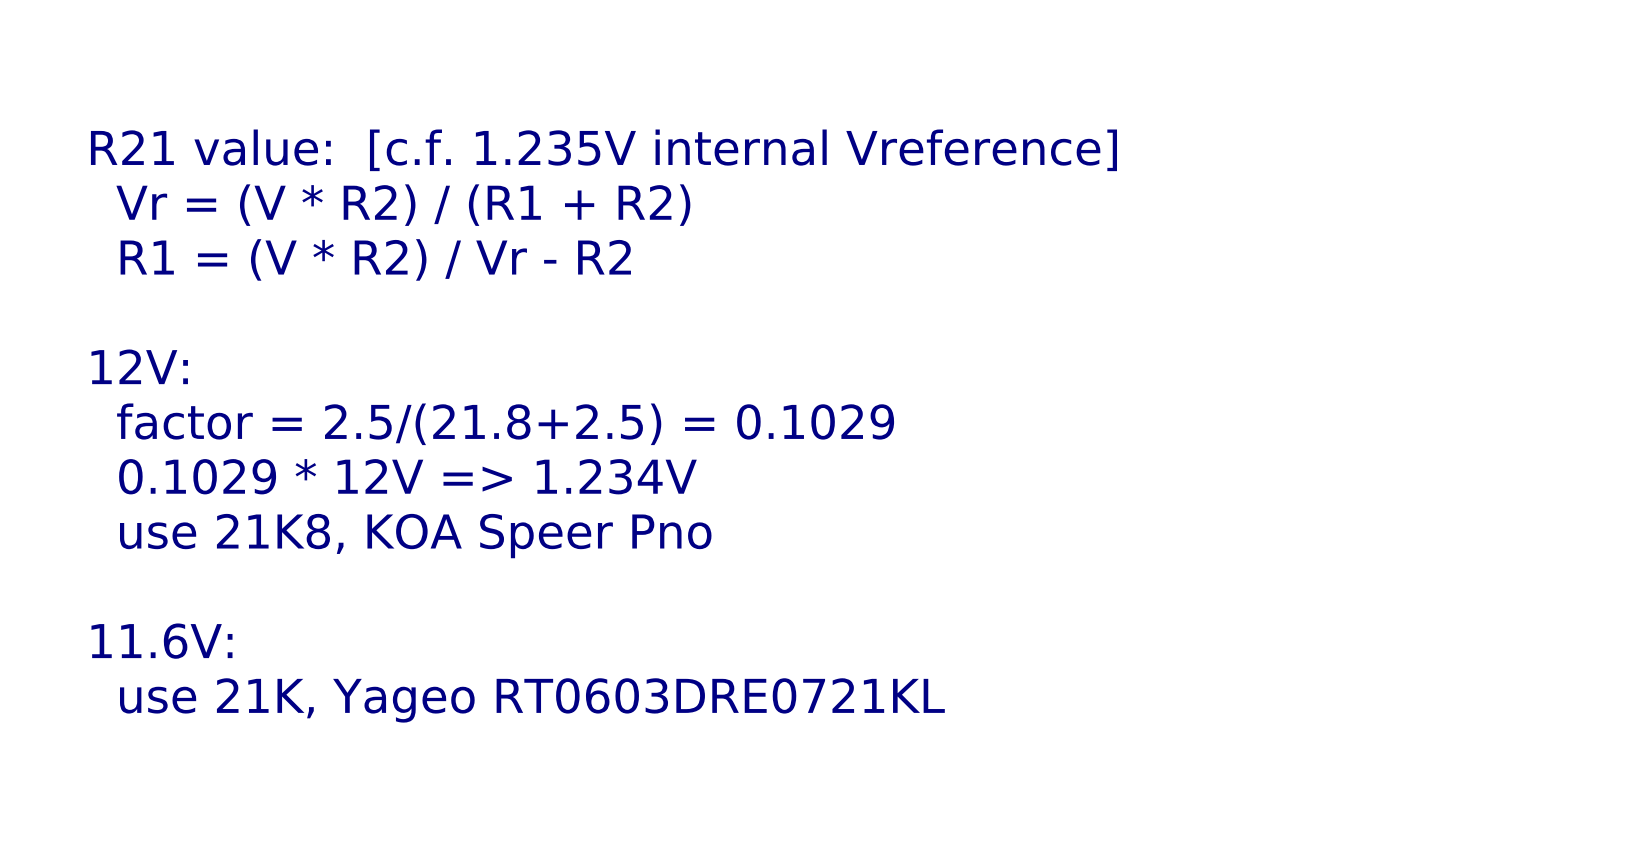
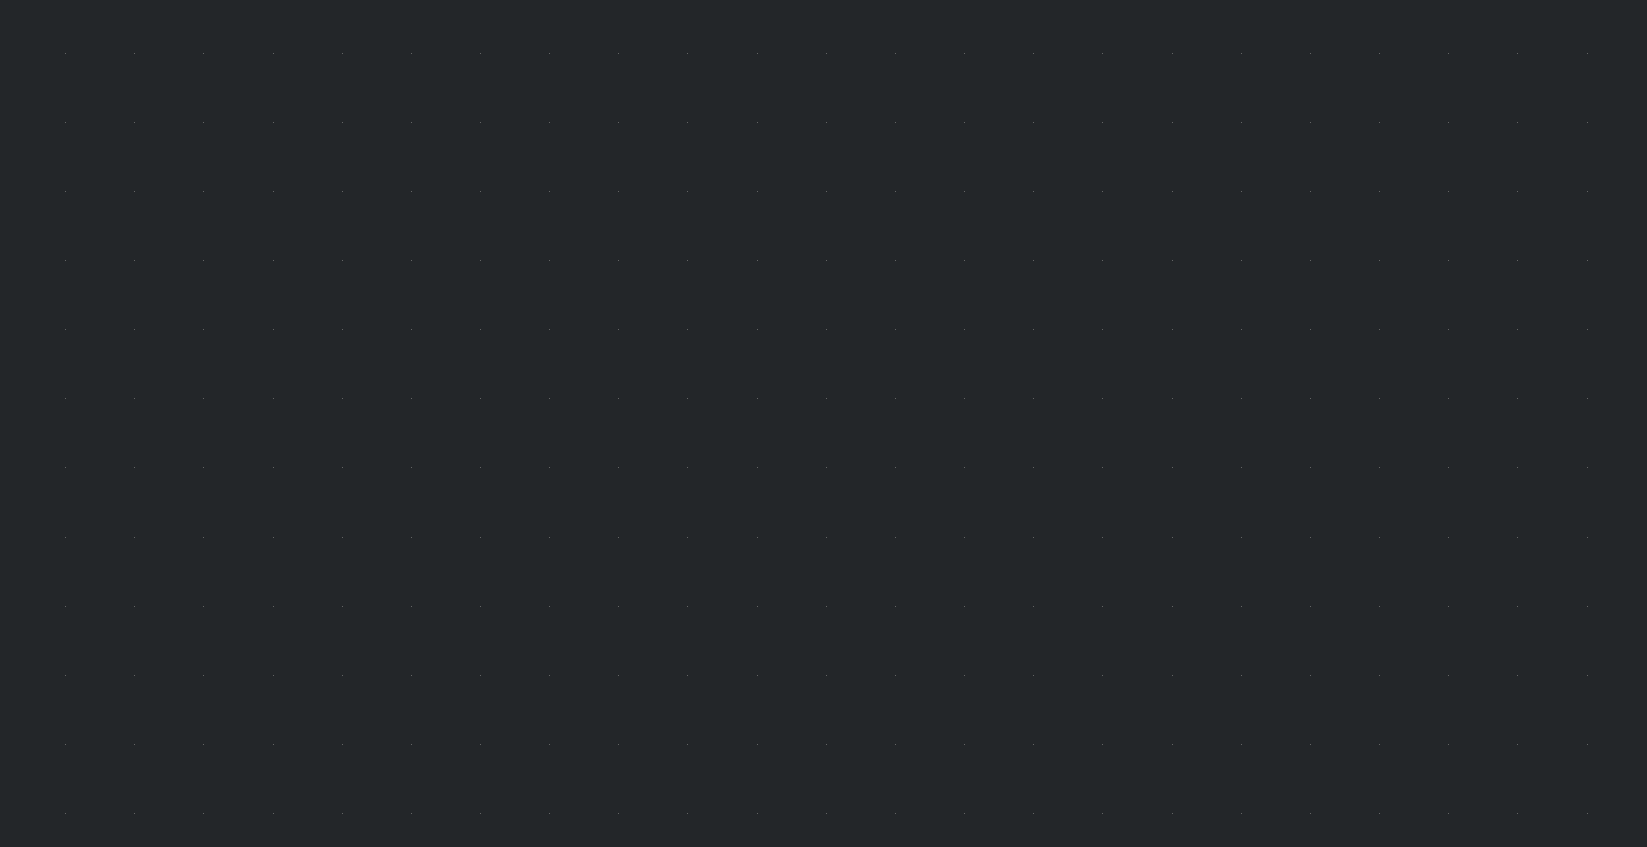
text: R21 value: [c.f. 1.235V internal Vreference] (603, 150) -> none
text: Vr = (V * R2) / (R1 + R2) (403, 205) -> none
text: R1 = (V * R2) / Vr - R2 (375, 259) -> none
text: 12V: (139, 366) -> none
text: factor = 2.5/(21.8+2.5) = 0.1029 (505, 424) -> none
text: 0.1029 * 12V => 1.234V (407, 476) -> none
text: use 21K8, KOA Speer Pno (415, 536) -> none
text: 11.6V: (161, 641) -> none
text: use 21K, Yageo RT0603DRE0721KL (532, 700) -> none

